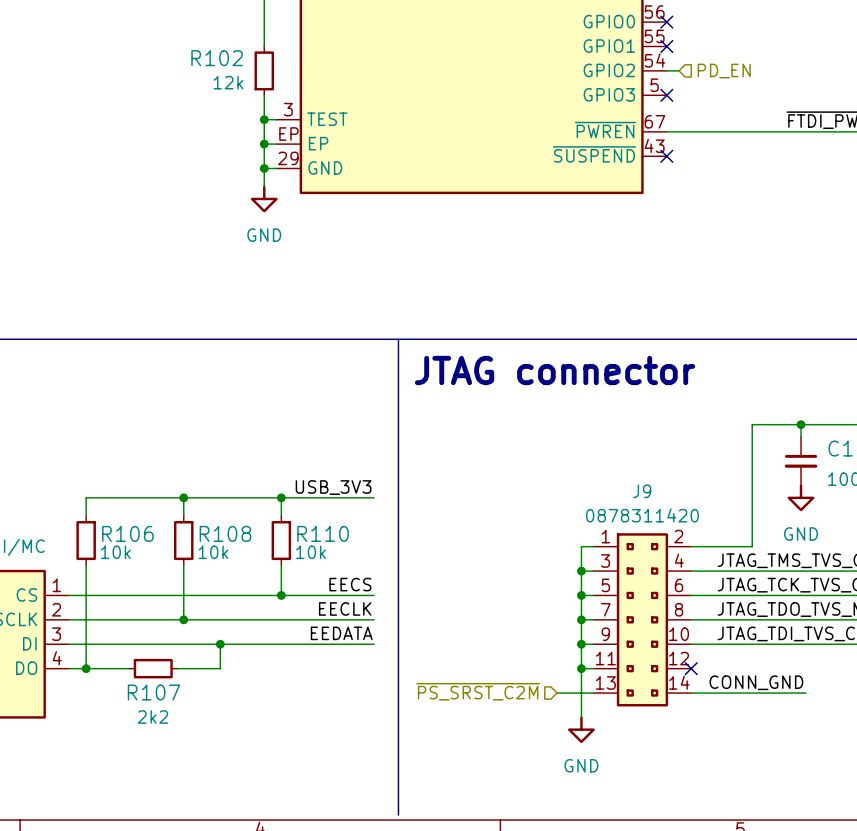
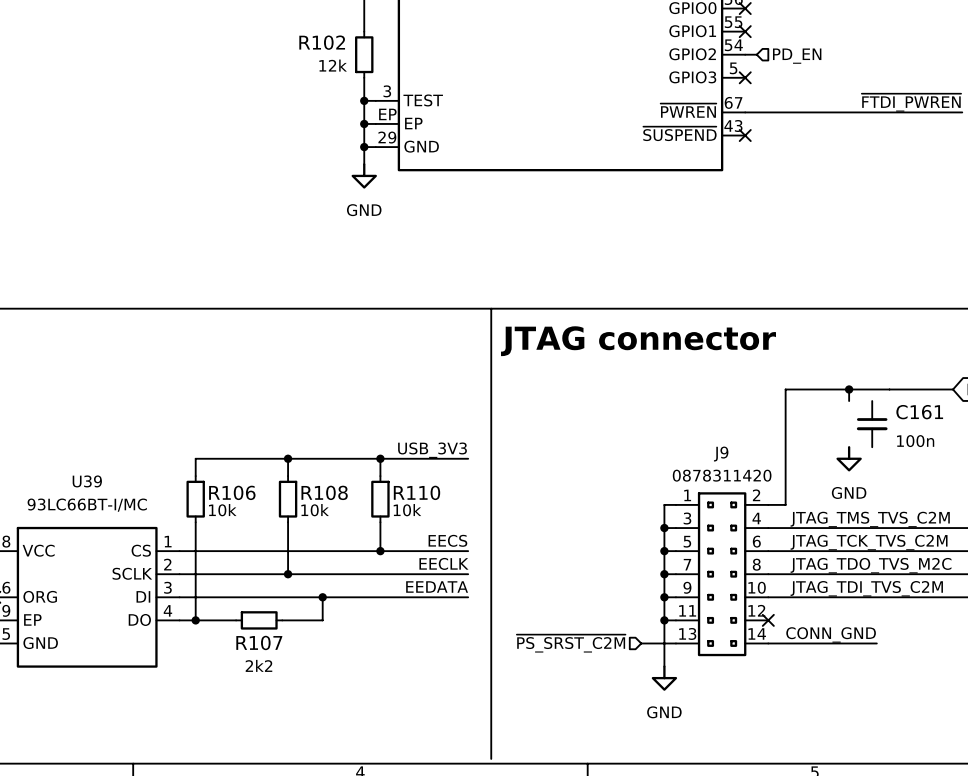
wire: (752, 424) (752, 546) (709, 546) -> (826, 389) (785, 389) (785, 504)
wire: (801, 424) (801, 436) -> (849, 389) (849, 401)
junction position: (801, 424) -> (849, 389)
power symbol position: GND (801, 497) -> GND (849, 458)

